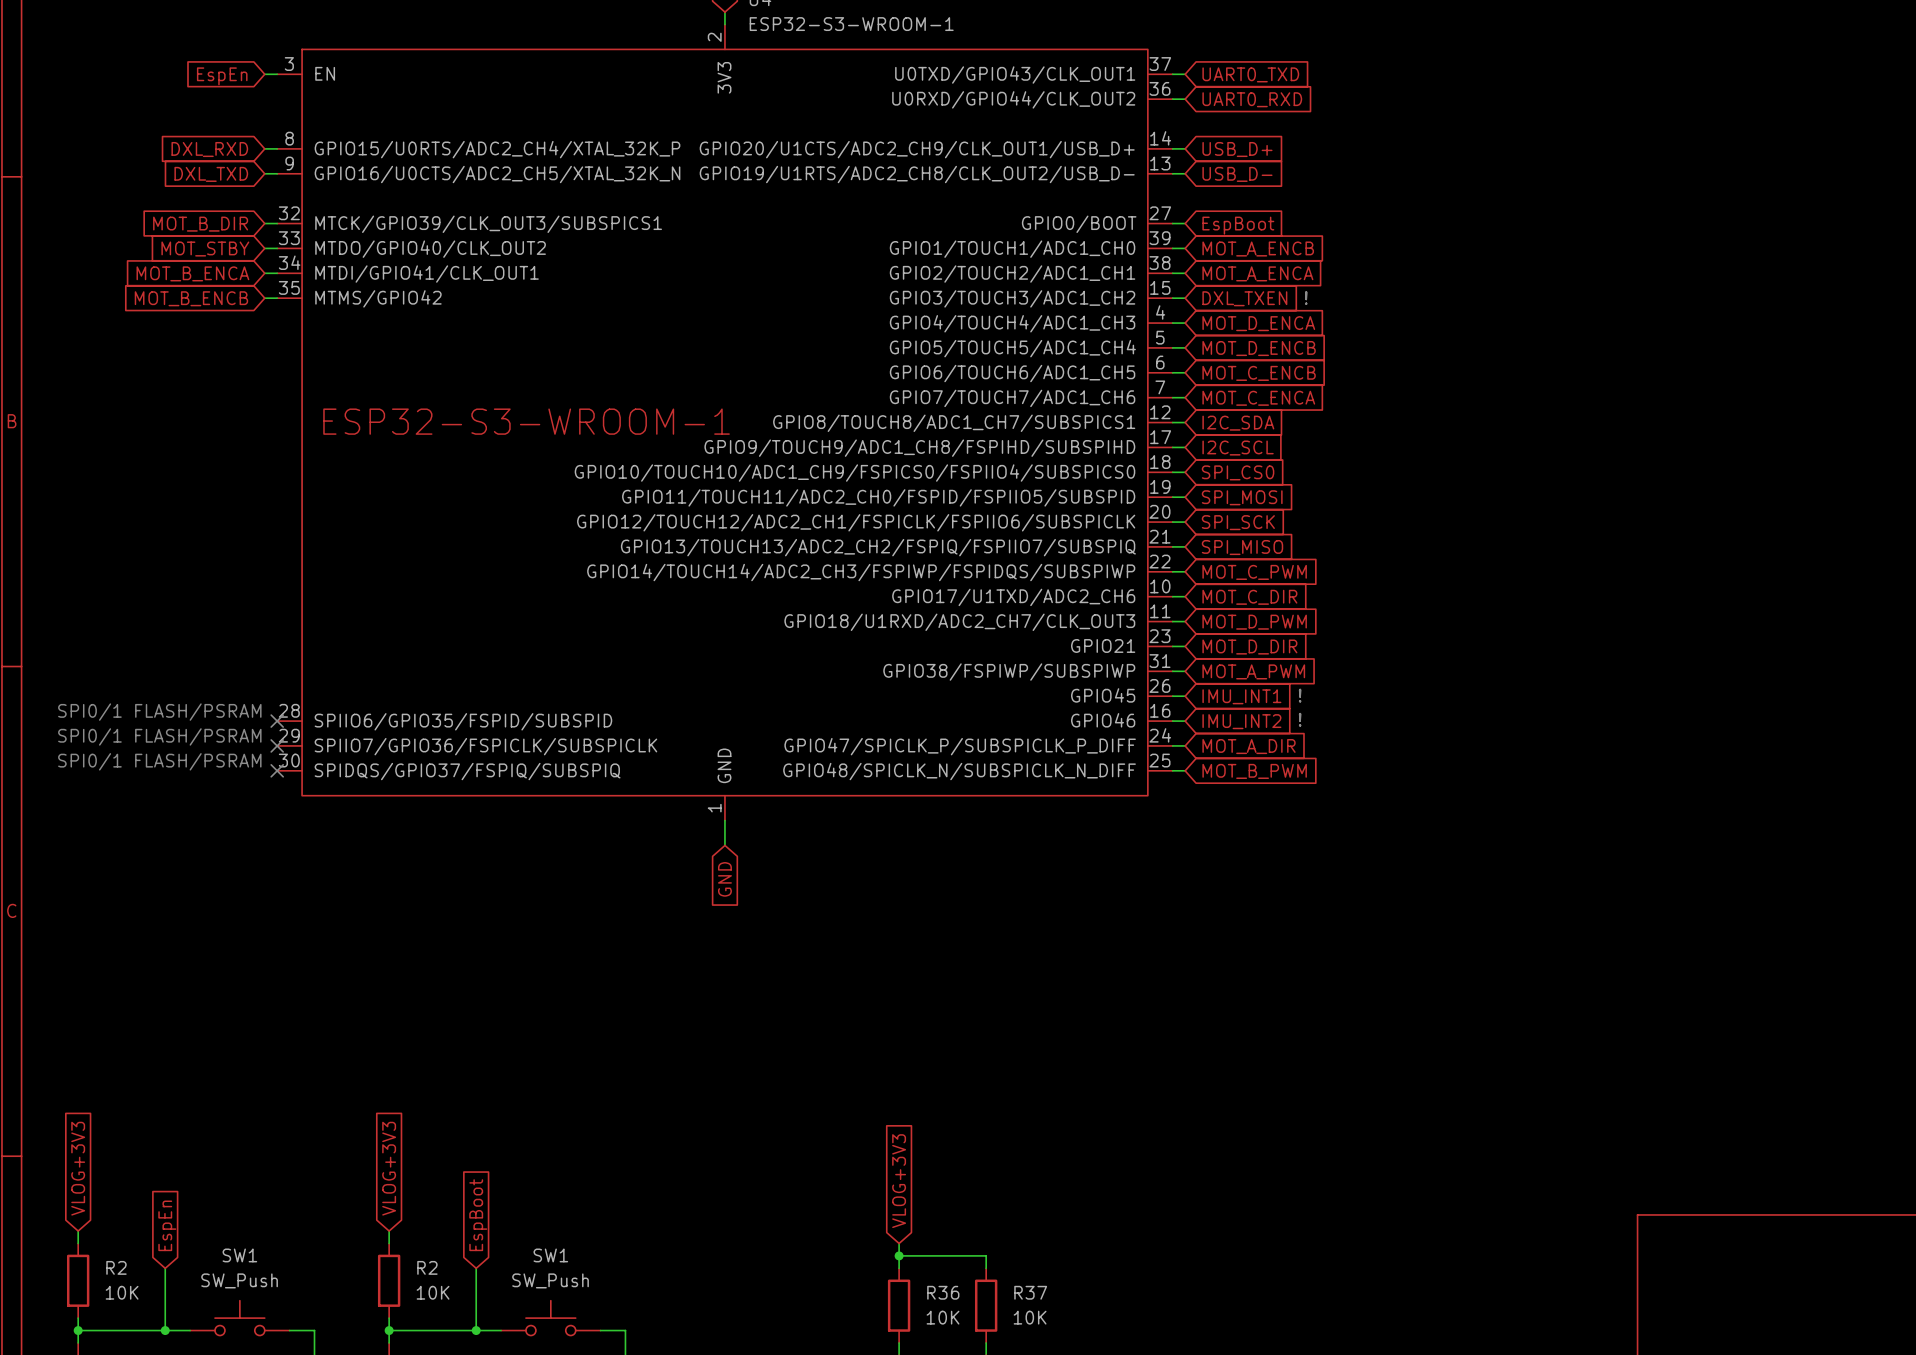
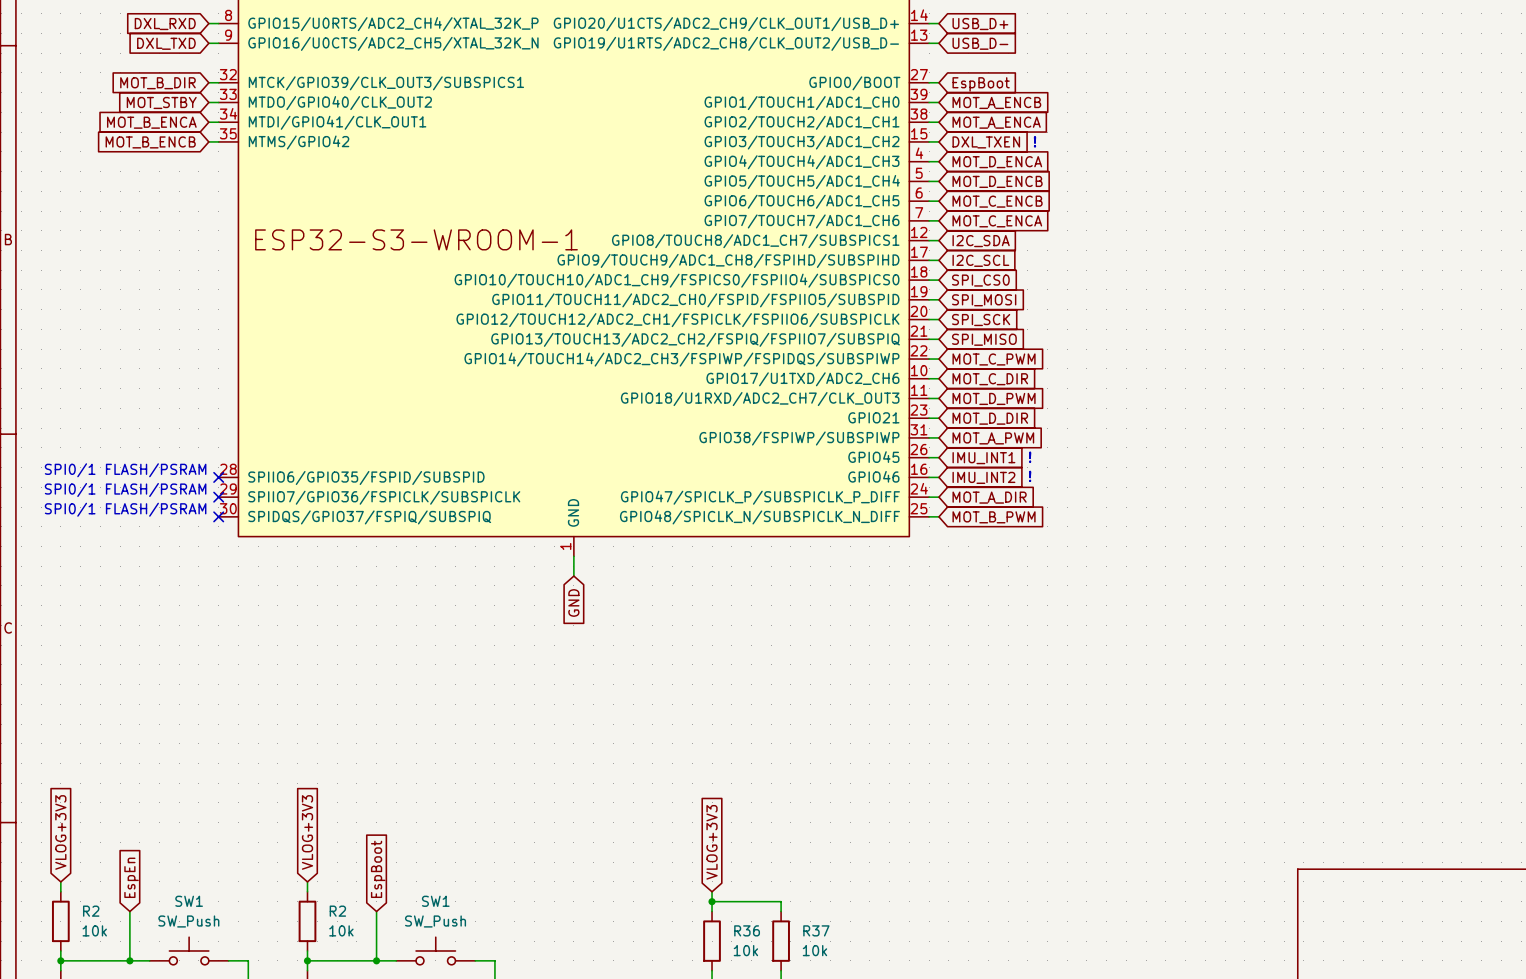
R2 value: 10K (122, 1292) -> 10k (94, 930)
R2 value: 10K (433, 1292) -> 10k (341, 930)
R36 value: 10K (943, 1317) -> 10k (745, 950)
R37 value: 10K (1030, 1317) -> 10k (814, 950)

